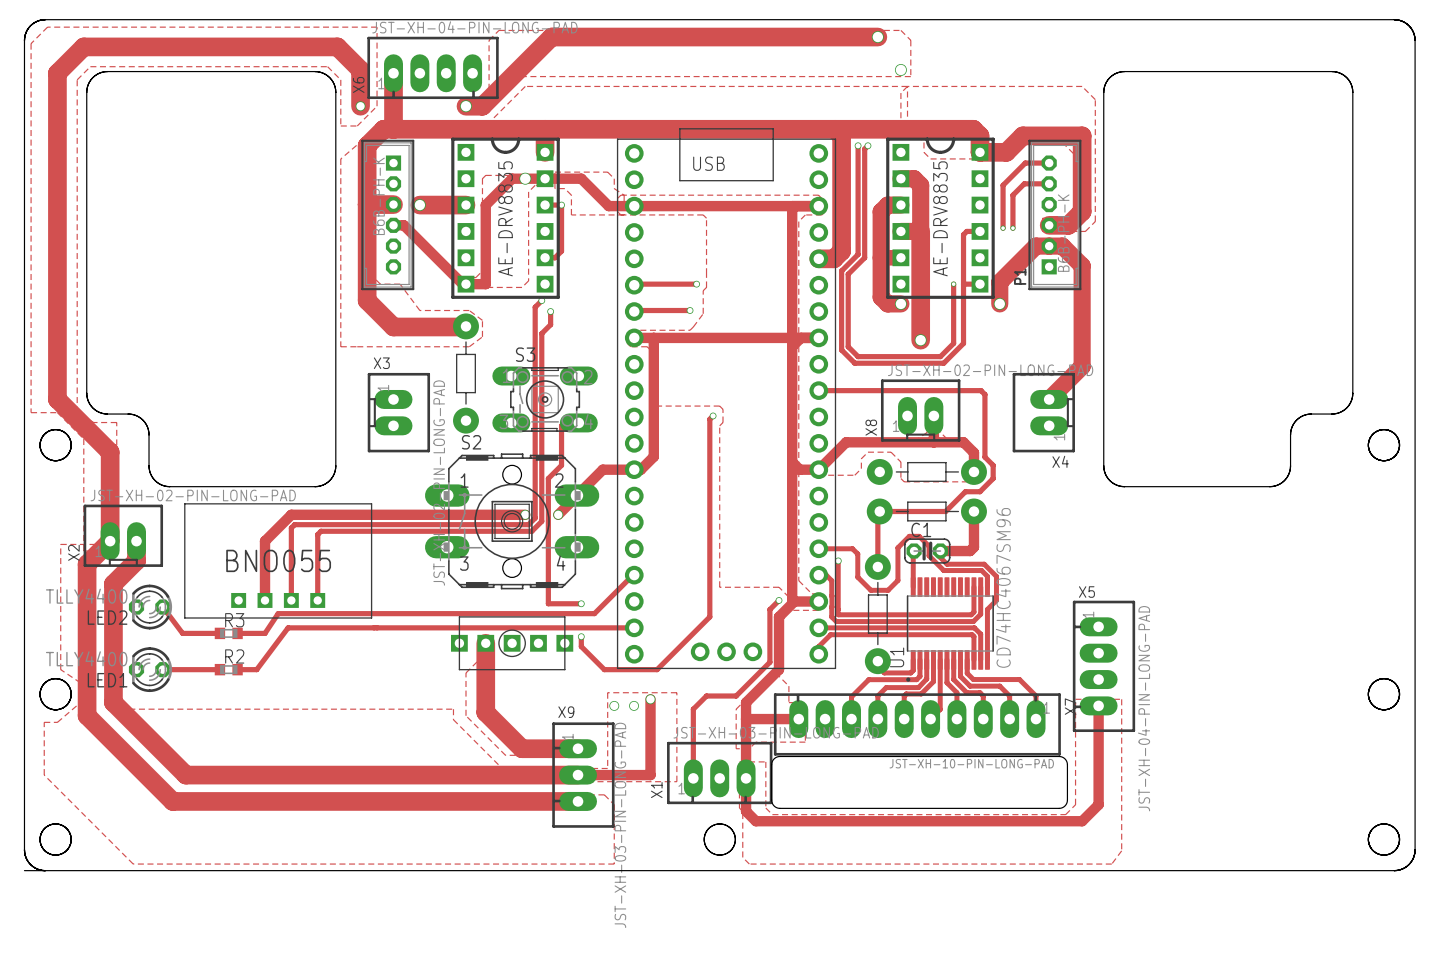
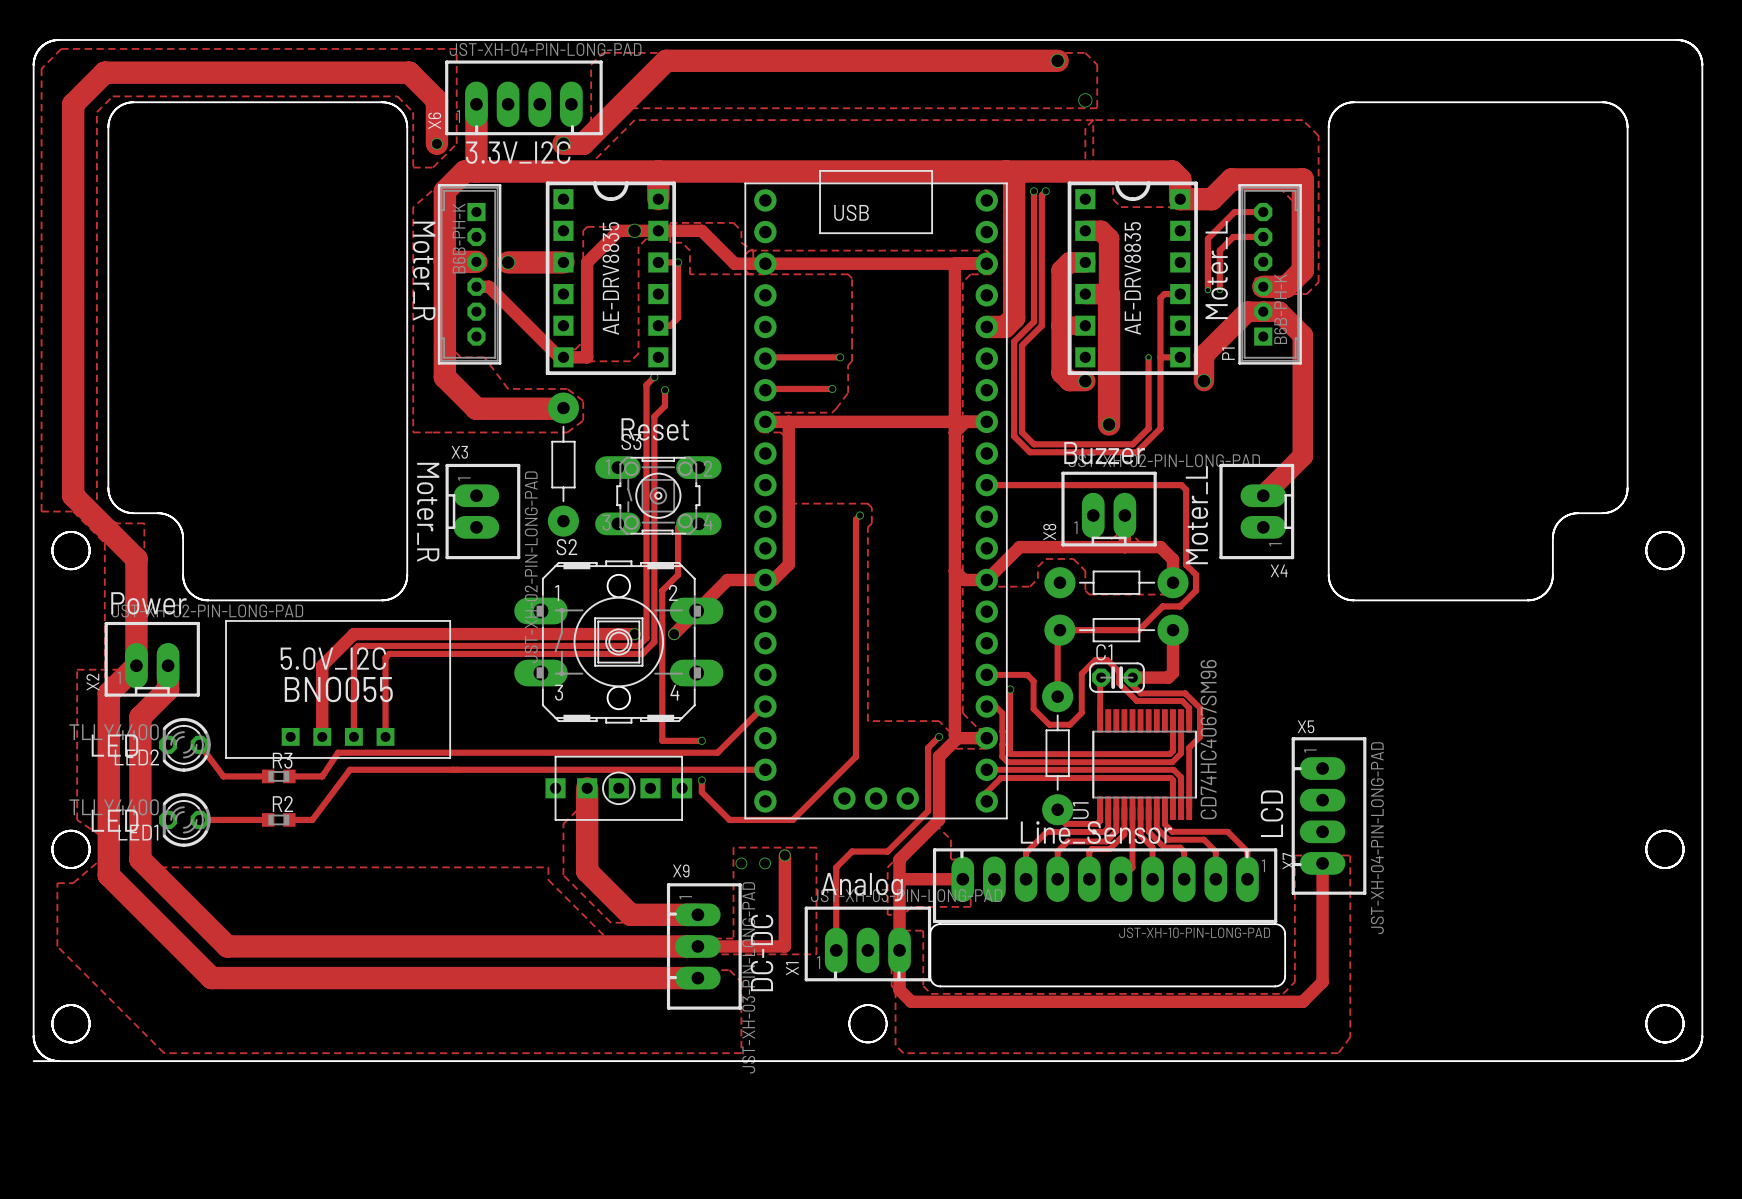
text: none -> 3.3V_I2C (518, 152)
text: none -> Moter_L (1216, 270)
text: none -> Moter_R (424, 271)
text: none -> Reset (655, 429)
text: none -> Buzzer (1104, 453)
text: none -> Moter_L (1196, 515)
text: none -> Moter_R (428, 512)
text: none -> Power (149, 603)
text: none -> 5.0V_I2C (333, 658)
text: none -> LED (114, 745)
text: none -> LCD (1271, 813)
text: none -> LED (114, 820)
text: none -> Line_Sensor (1096, 832)
text: none -> Analog (862, 887)
text: none -> DC-DC (761, 953)

